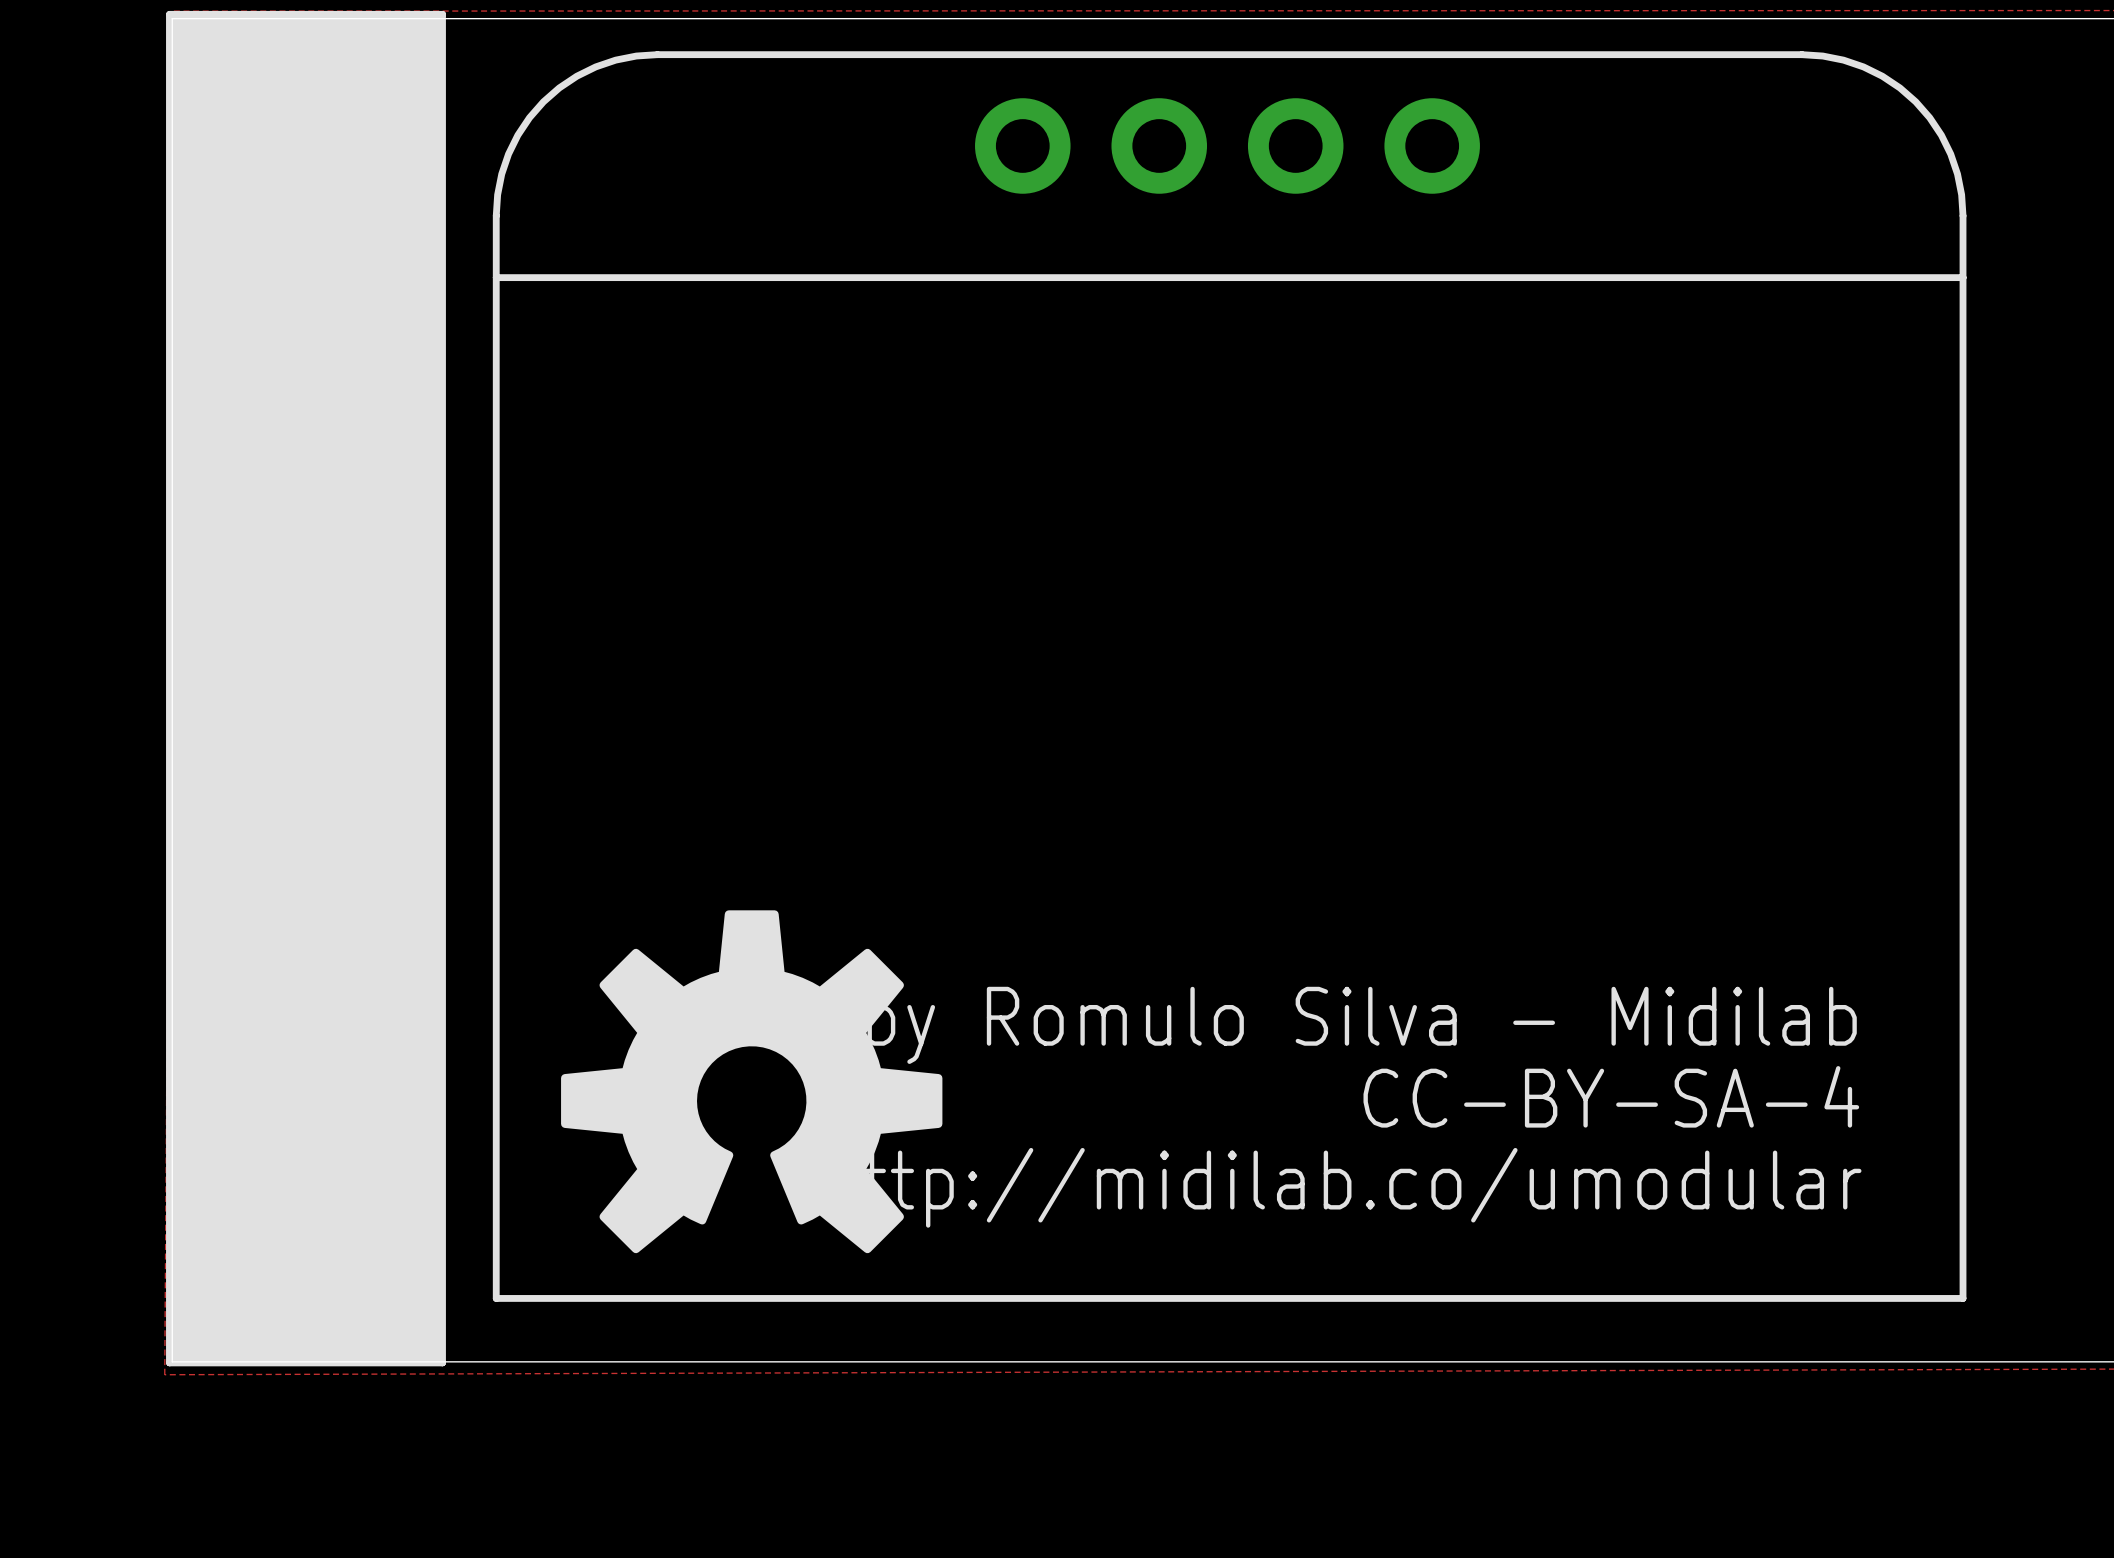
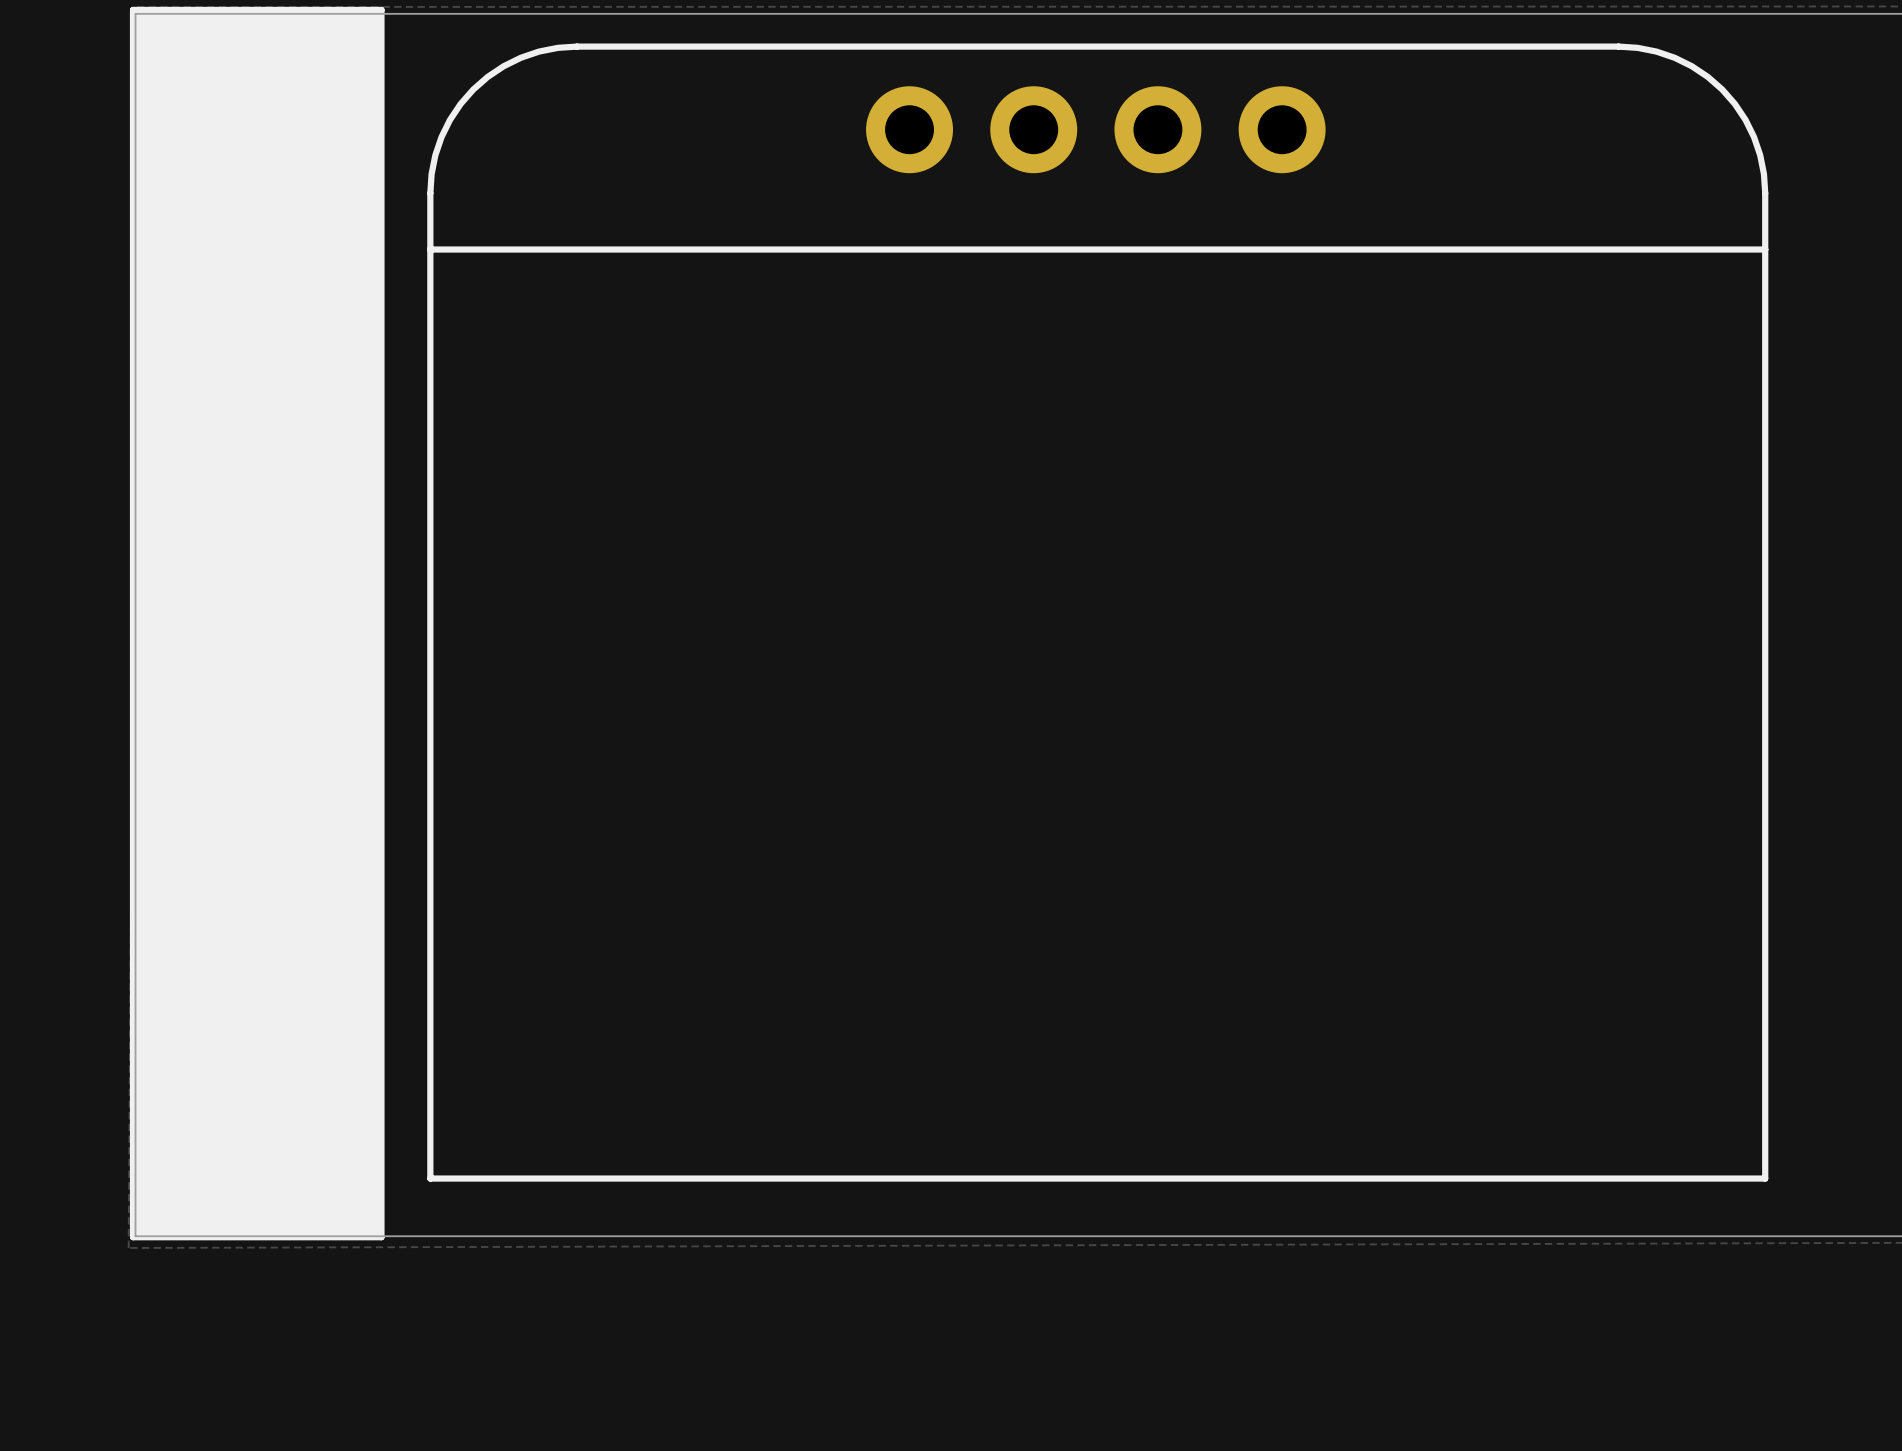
drawing: [561, 910, 943, 1254] -> none
text: by Romulo Silva - Midilab (1362, 1025) -> none
text: CC-BY-SA-4 (1611, 1096) -> none
text: http://midilab.co/umodular (1343, 1187) -> none

